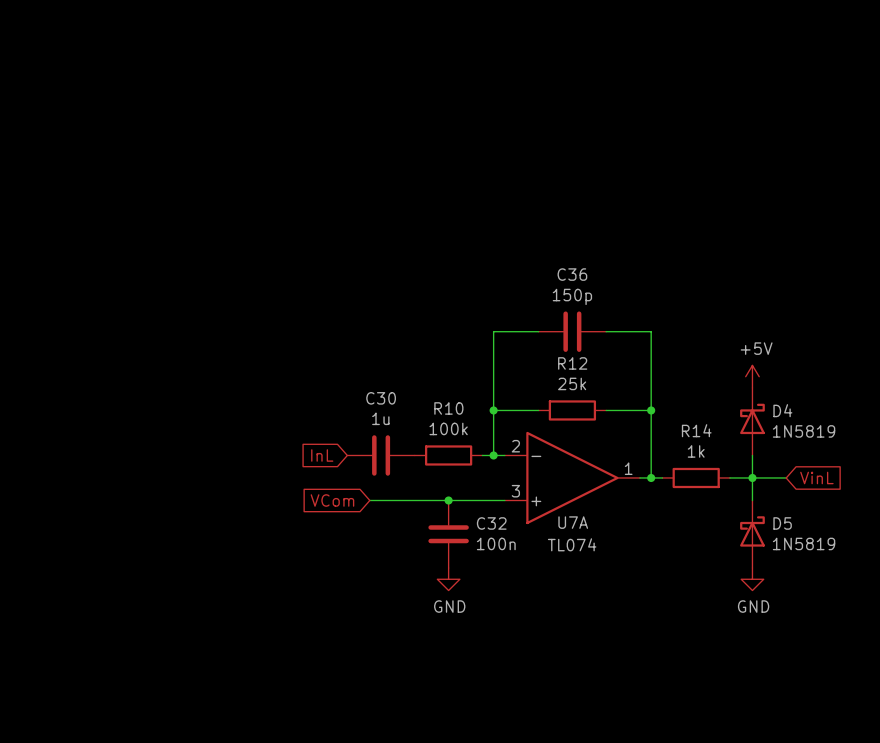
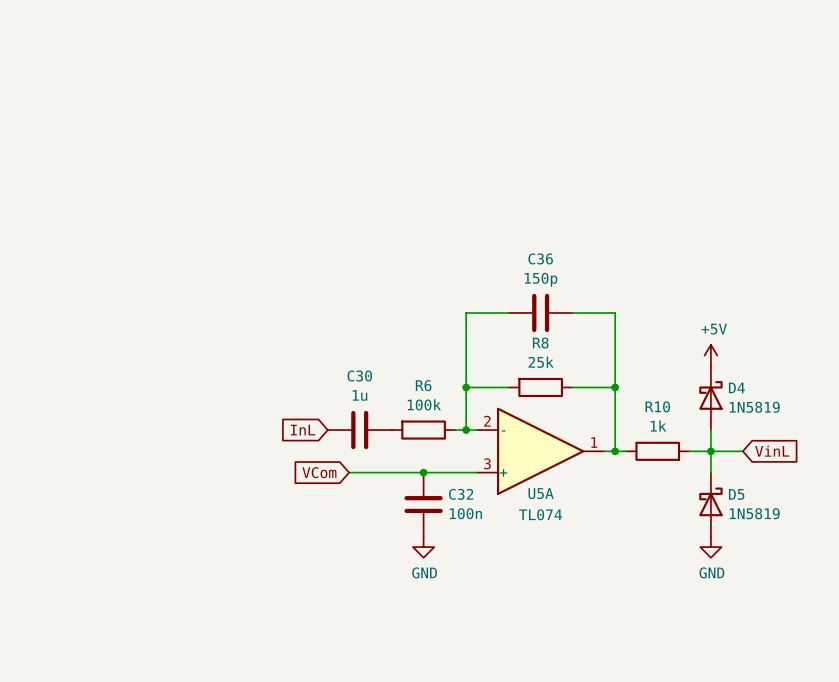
R12 name: R12 (572, 363) -> R8 (540, 343)
R10 name: R10 (448, 408) -> R6 (423, 385)
R14 name: R14 (696, 430) -> R10 (657, 406)
U7A name: U7A (573, 522) -> U5A (541, 493)

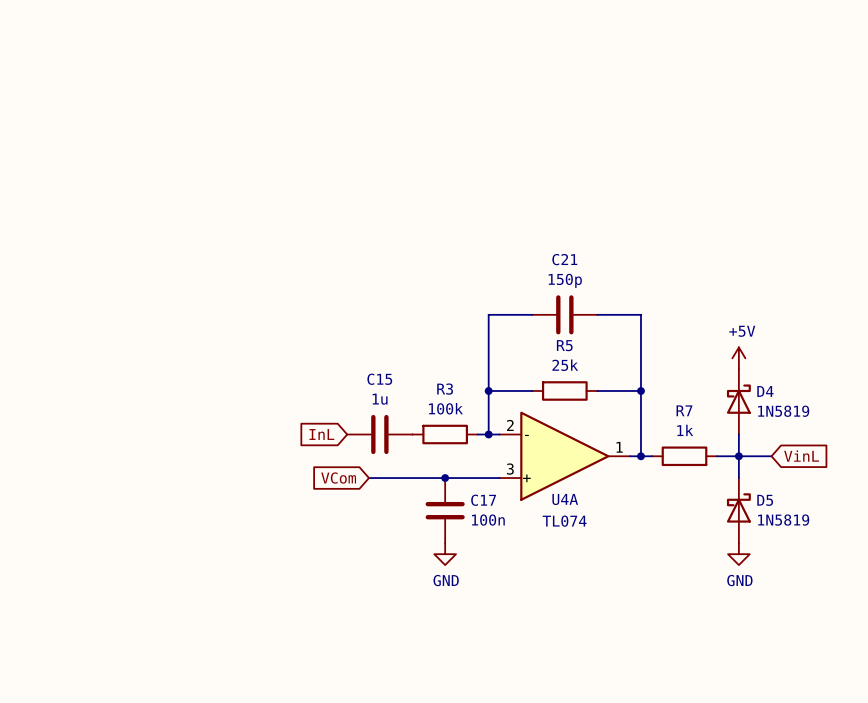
C36 name: C36 (540, 258) -> C21 (564, 259)
R8 name: R8 (540, 343) -> R5 (564, 345)
C30 name: C30 (359, 376) -> C15 (379, 379)
R6 name: R6 (423, 385) -> R3 (445, 389)
R10 name: R10 (657, 406) -> R7 (684, 410)
U5A name: U5A (541, 493) -> U4A (565, 499)
C32 name: C32 (461, 494) -> C17 (483, 500)

